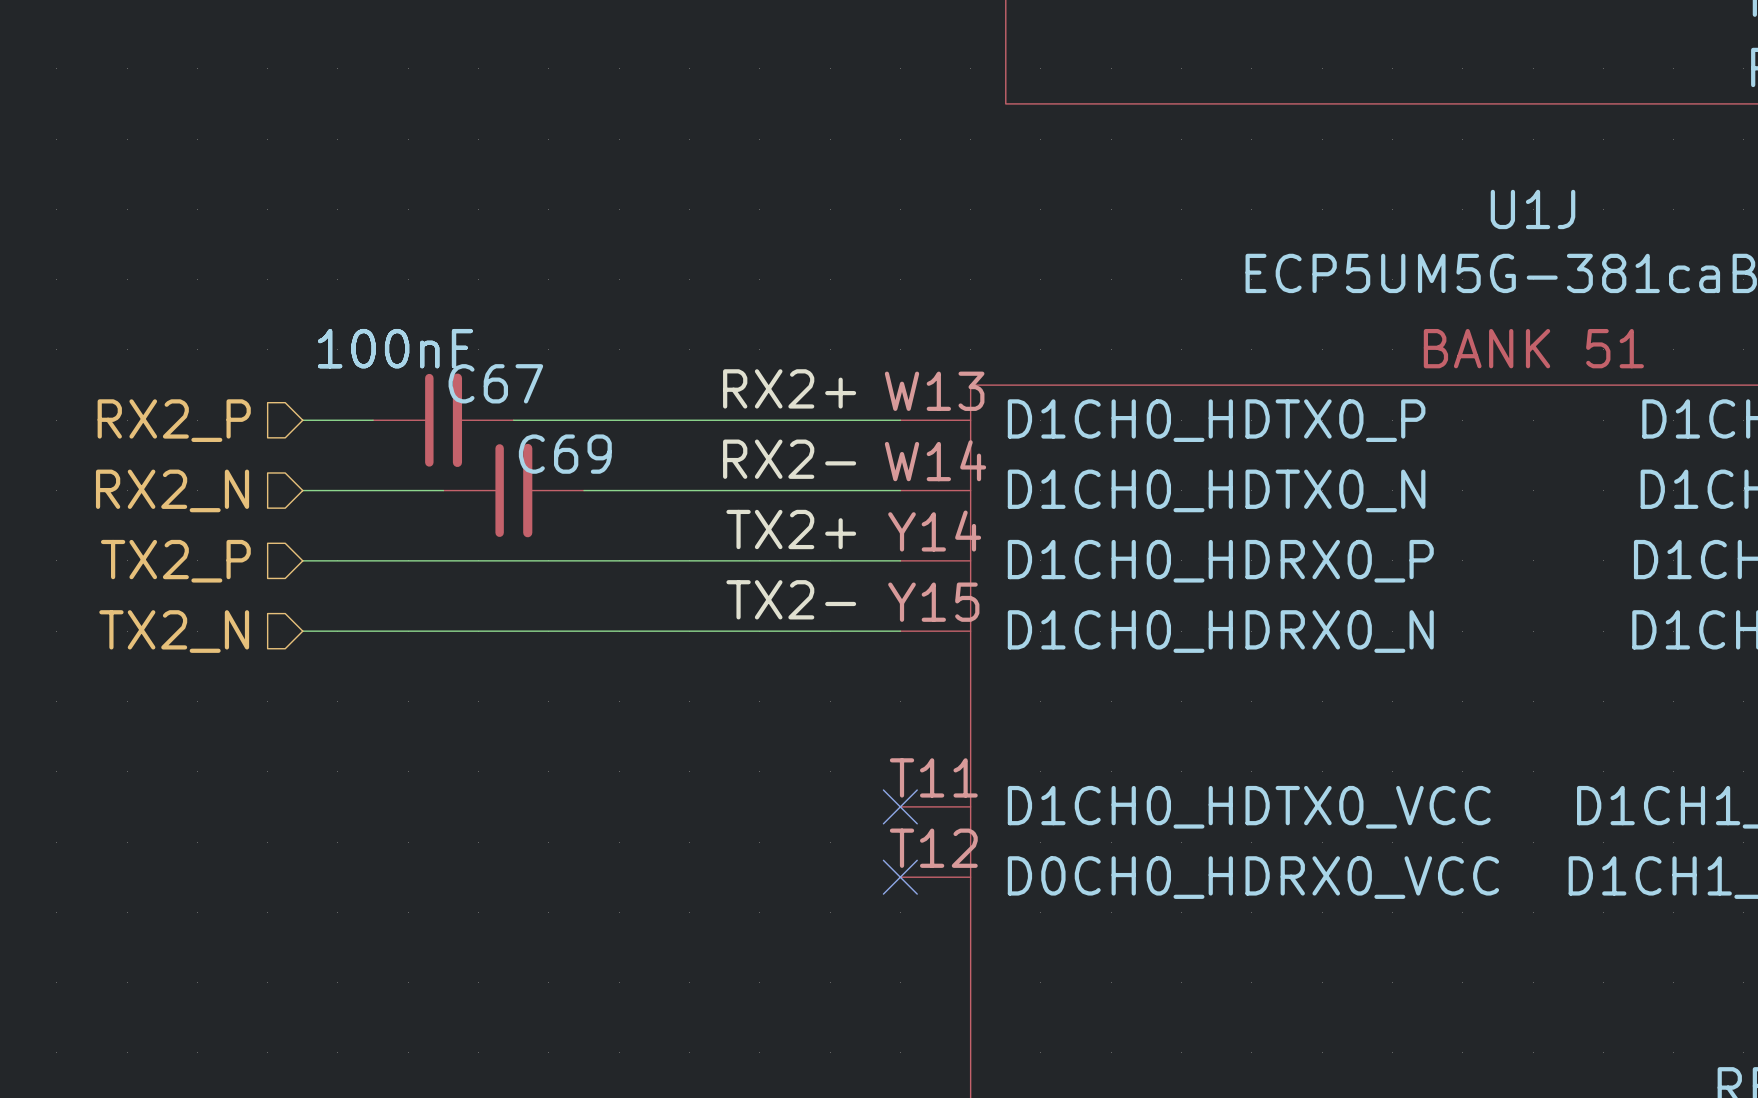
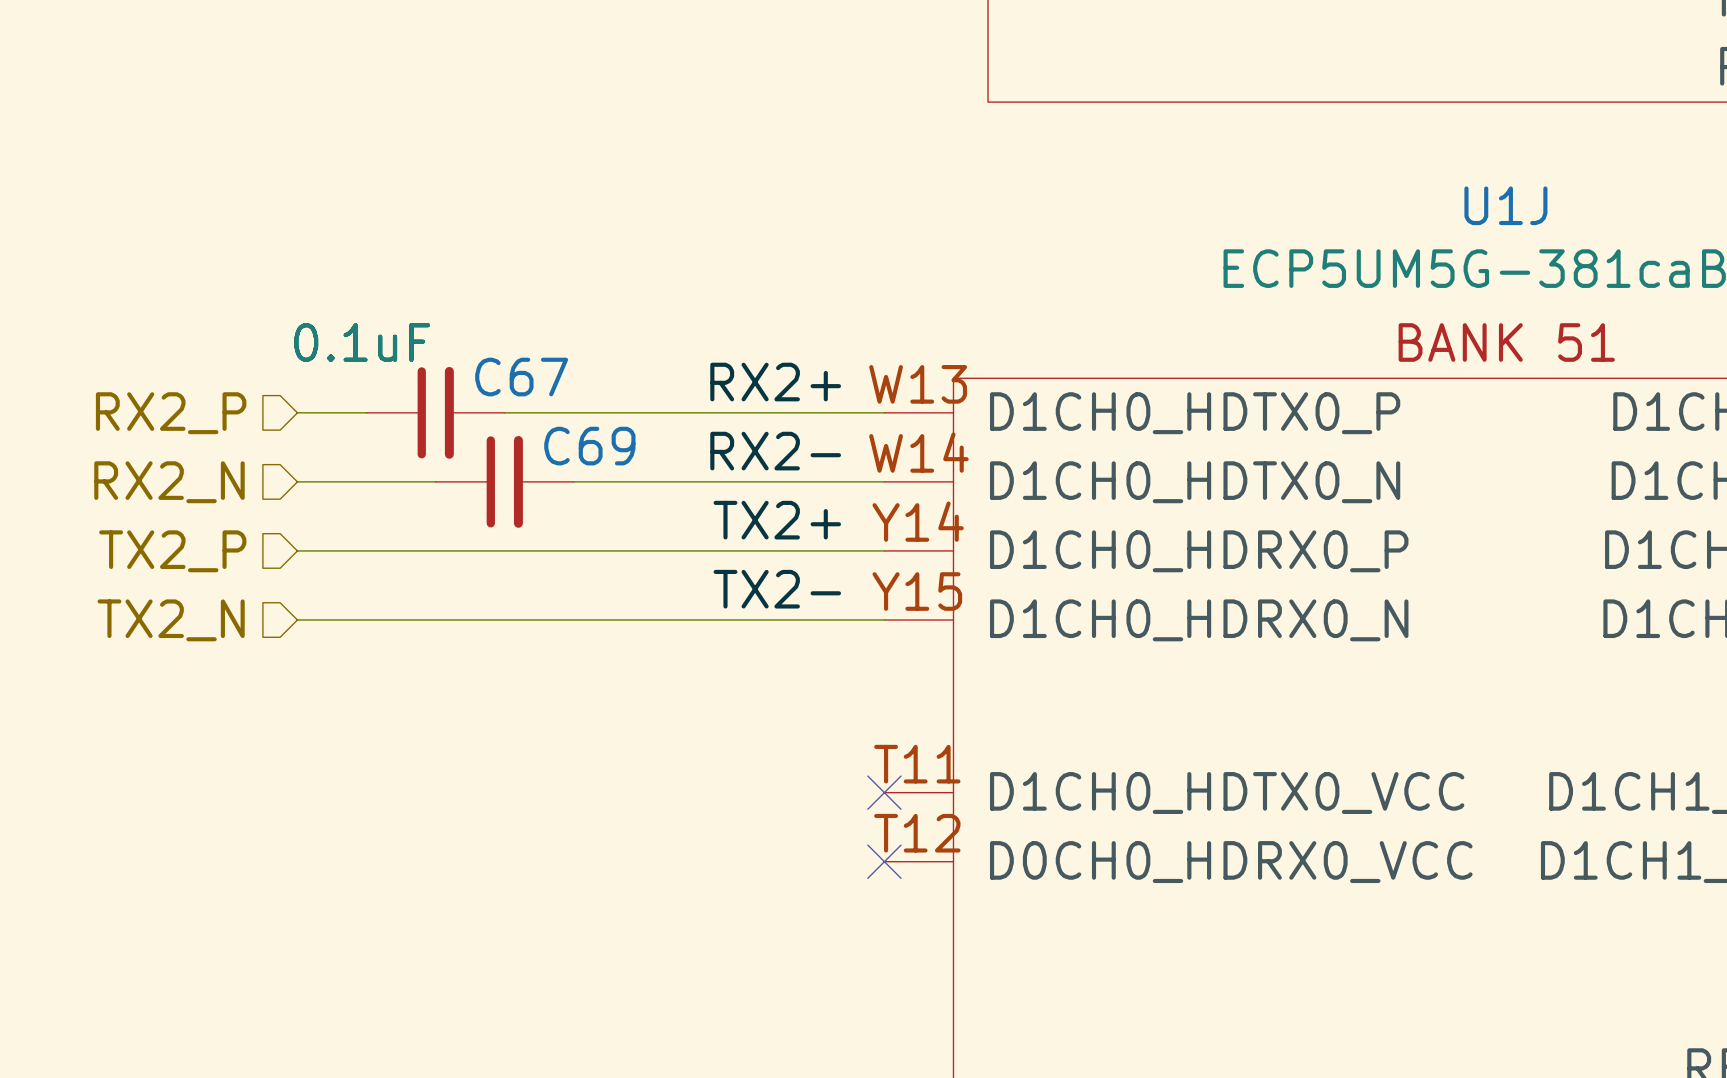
C67 value: 100nF (395, 348) -> 0.1uF (362, 342)
C69 value: 100nF (395, 348) -> 0.1uF (362, 342)
C67 name position: C67 (495, 383) -> C67 (521, 377)
C69 name position: C69 (565, 454) -> C69 (589, 446)

